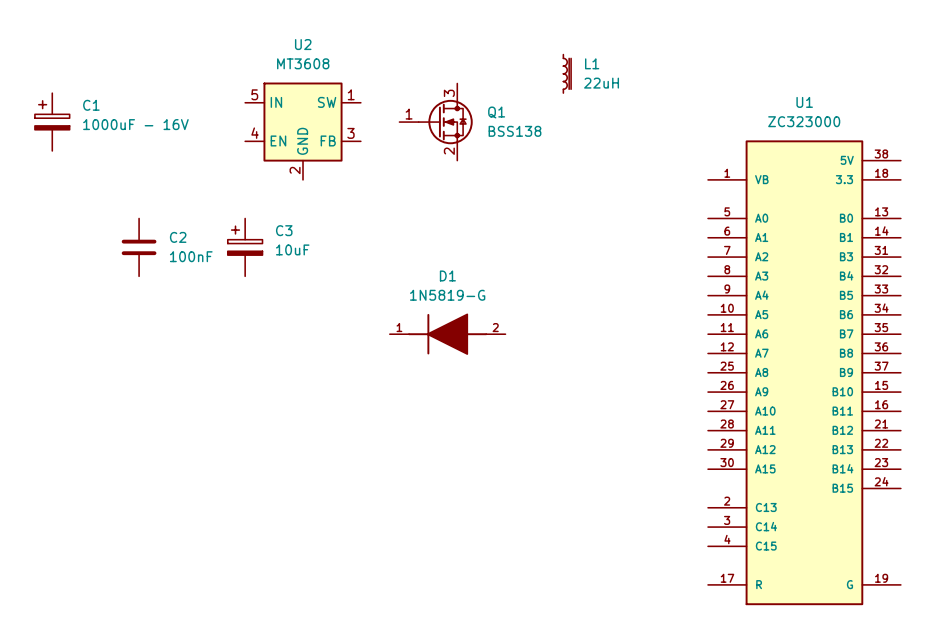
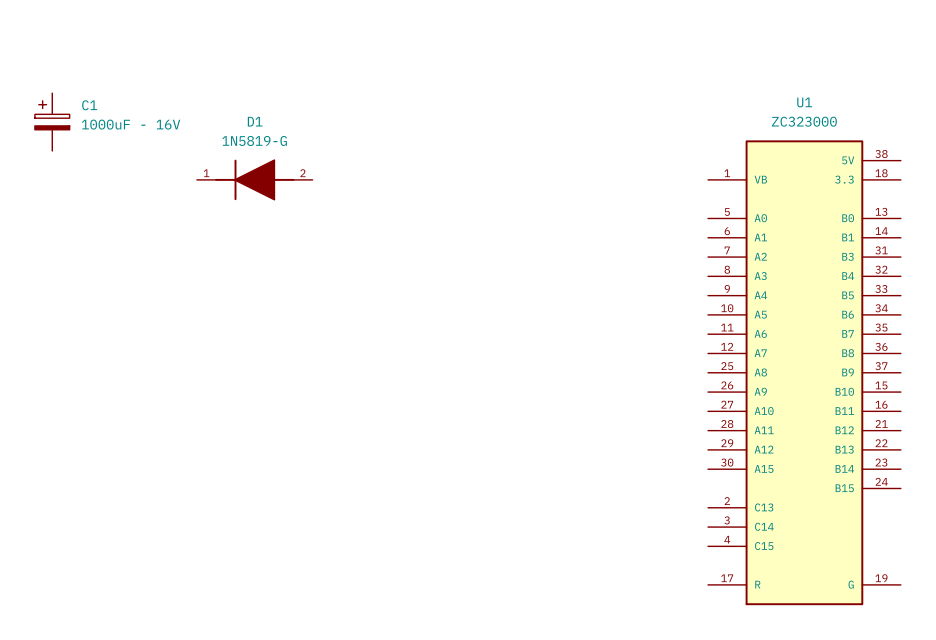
L1: 22uH (567, 73) -> none
Q1: BSS138 (436, 122) -> none
U2: MT3608 (303, 131) -> none
C2: 100nF (139, 247) -> none
C3: 10uF (245, 247) -> none
D1 position: (447, 334) -> (254, 179)

